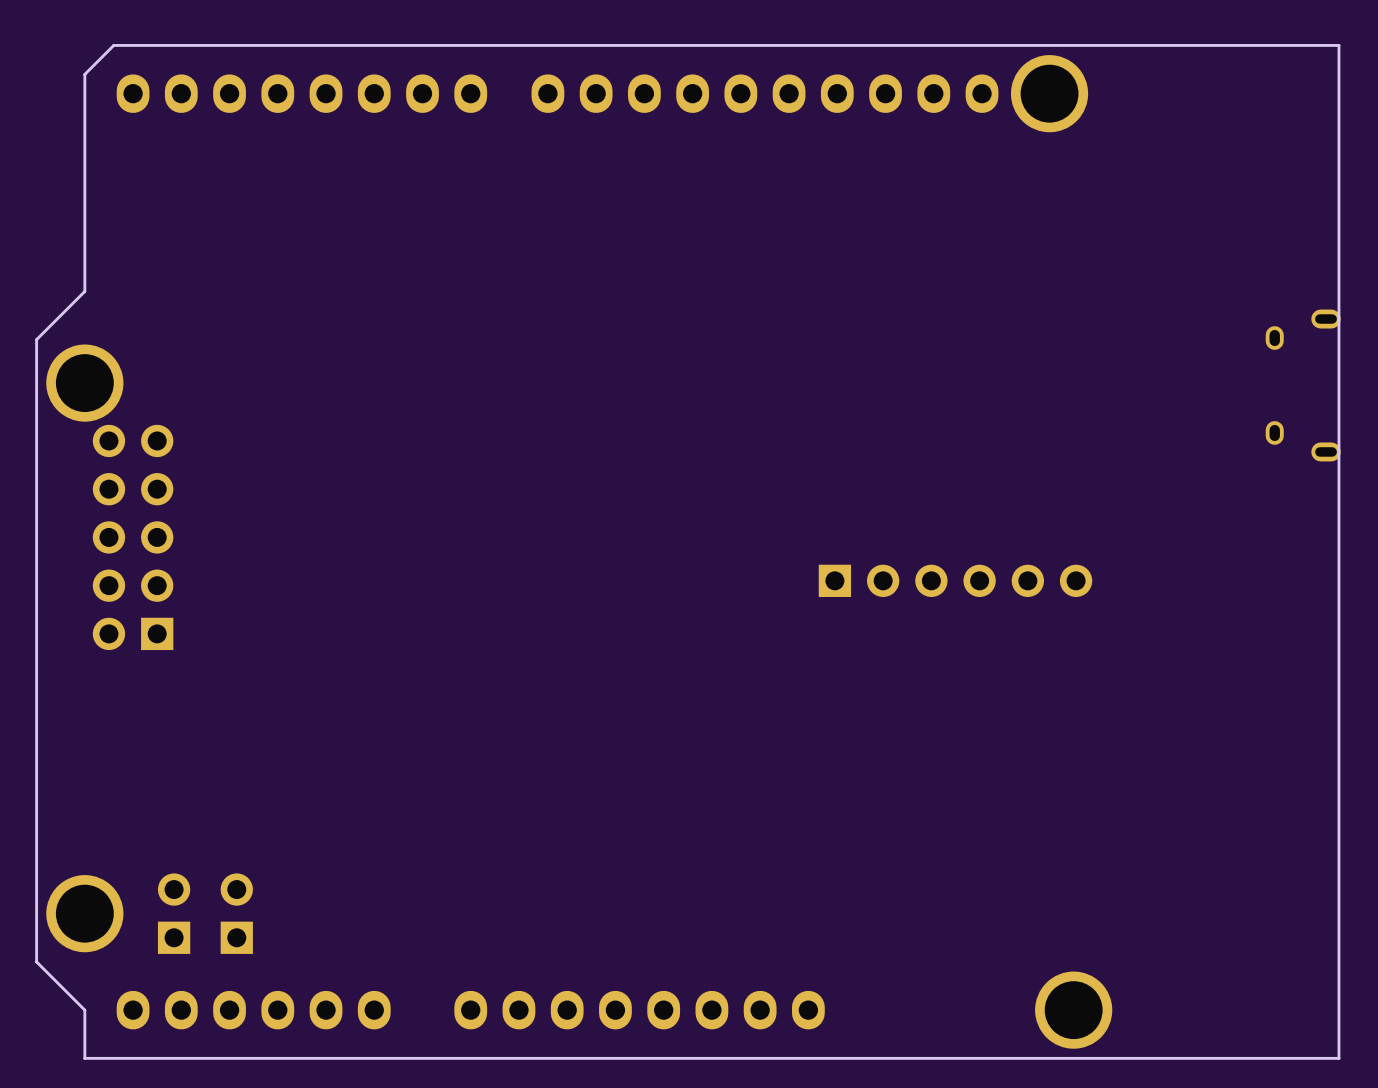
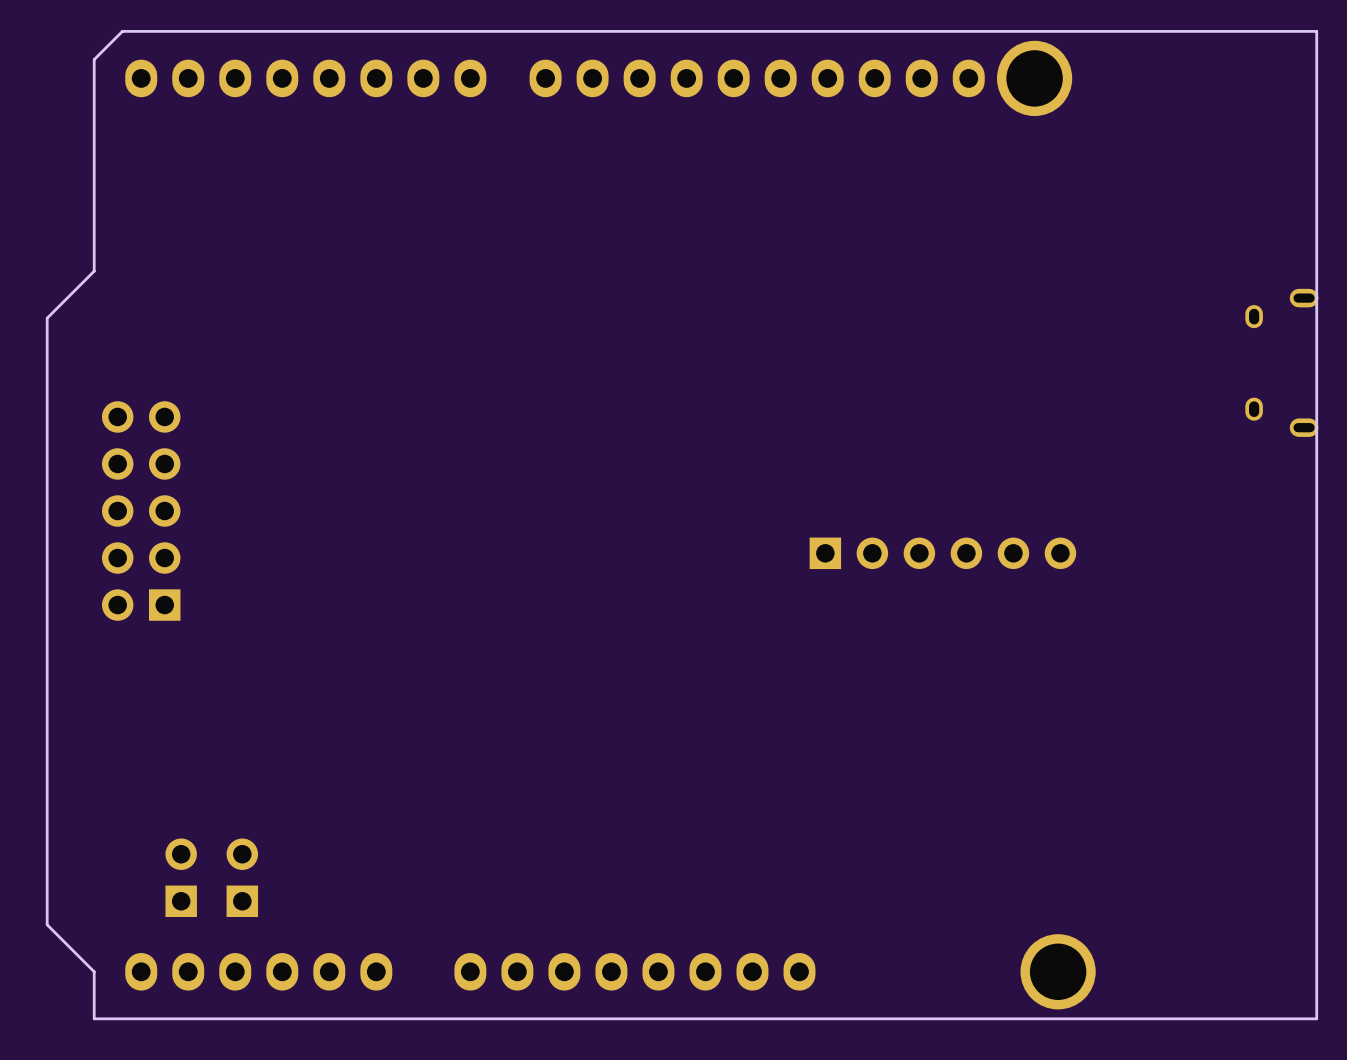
part: (84, 383) -> none
part: (84, 913) -> none

